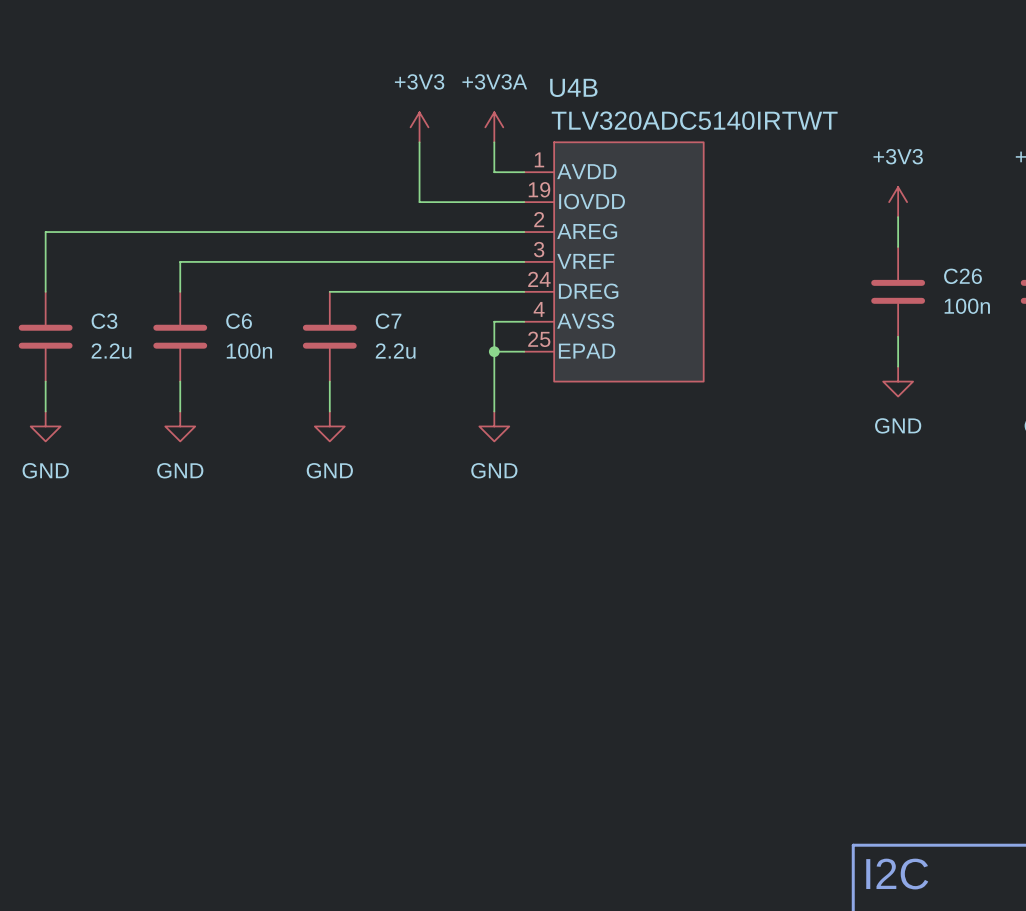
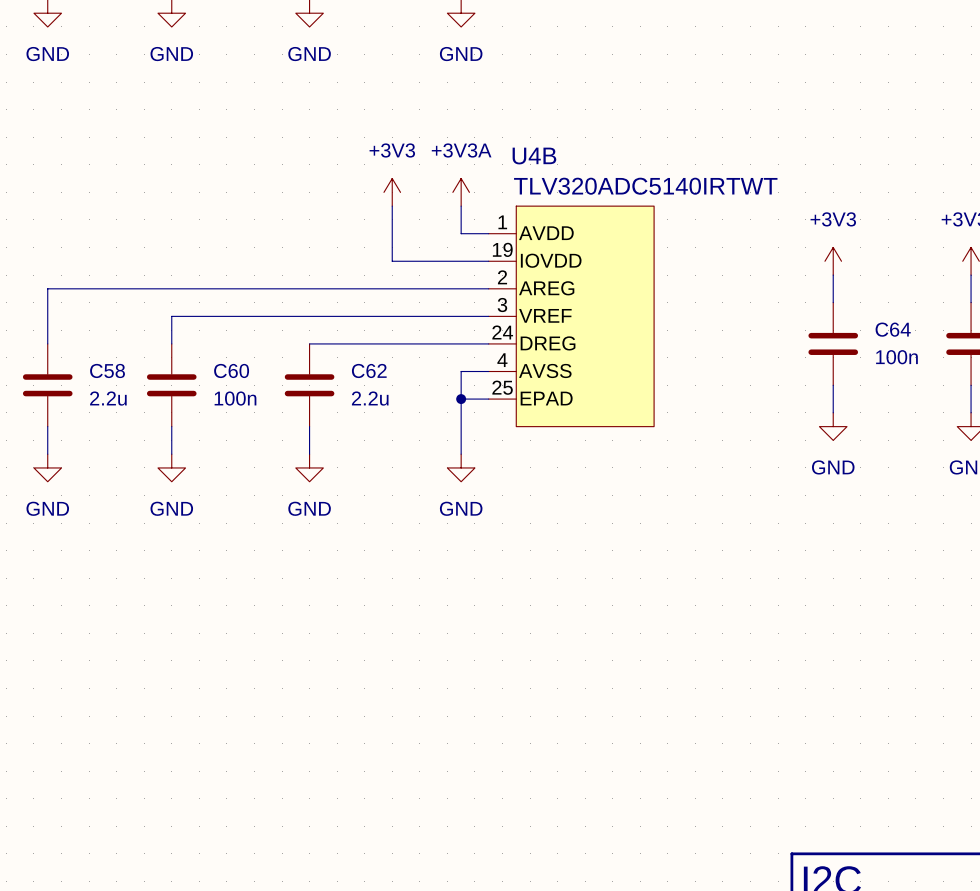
C26 name: C26 (963, 276) -> C64 (893, 329)
C3 name: C3 (104, 321) -> C58 (107, 370)
C6 name: C6 (239, 321) -> C60 (231, 370)
C7 name: C7 (388, 321) -> C62 (369, 370)

